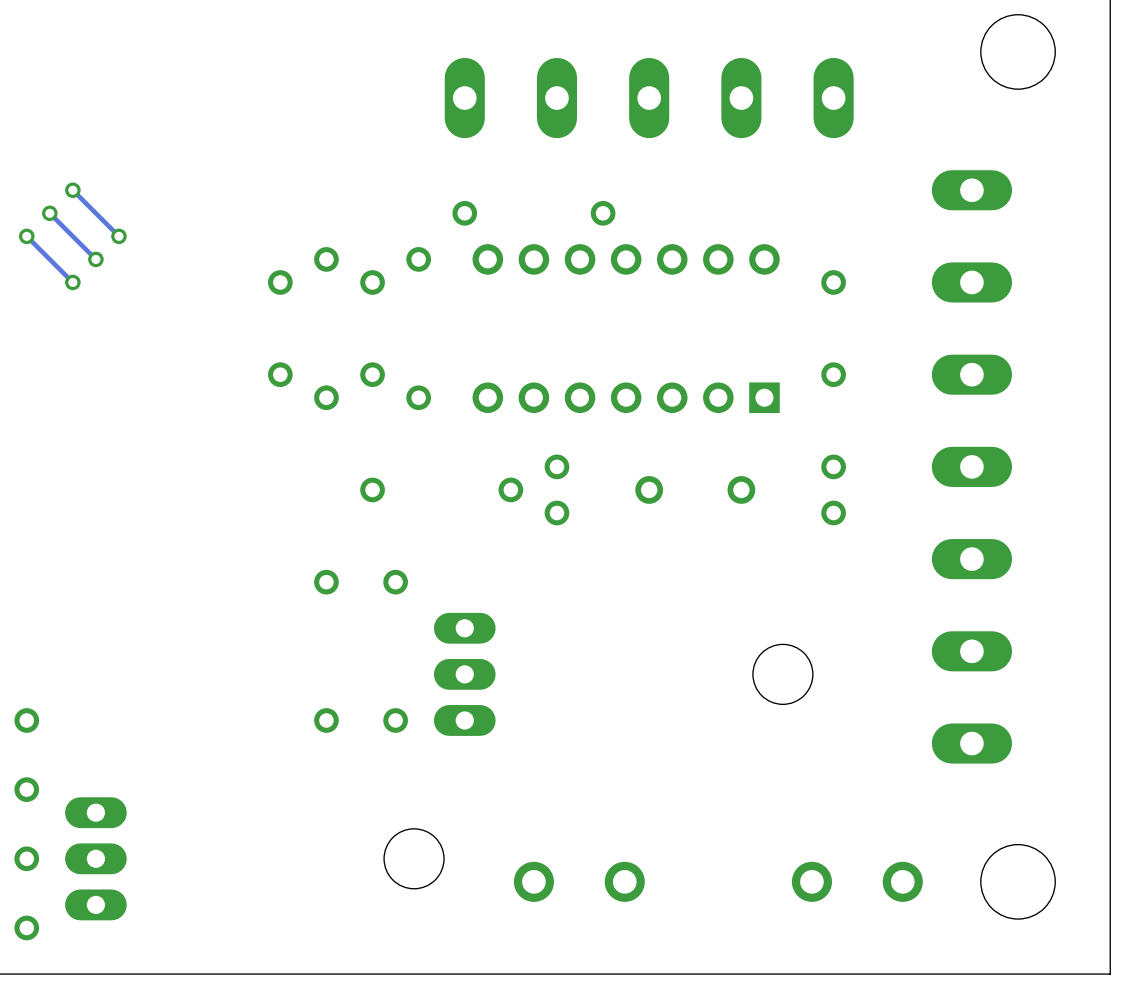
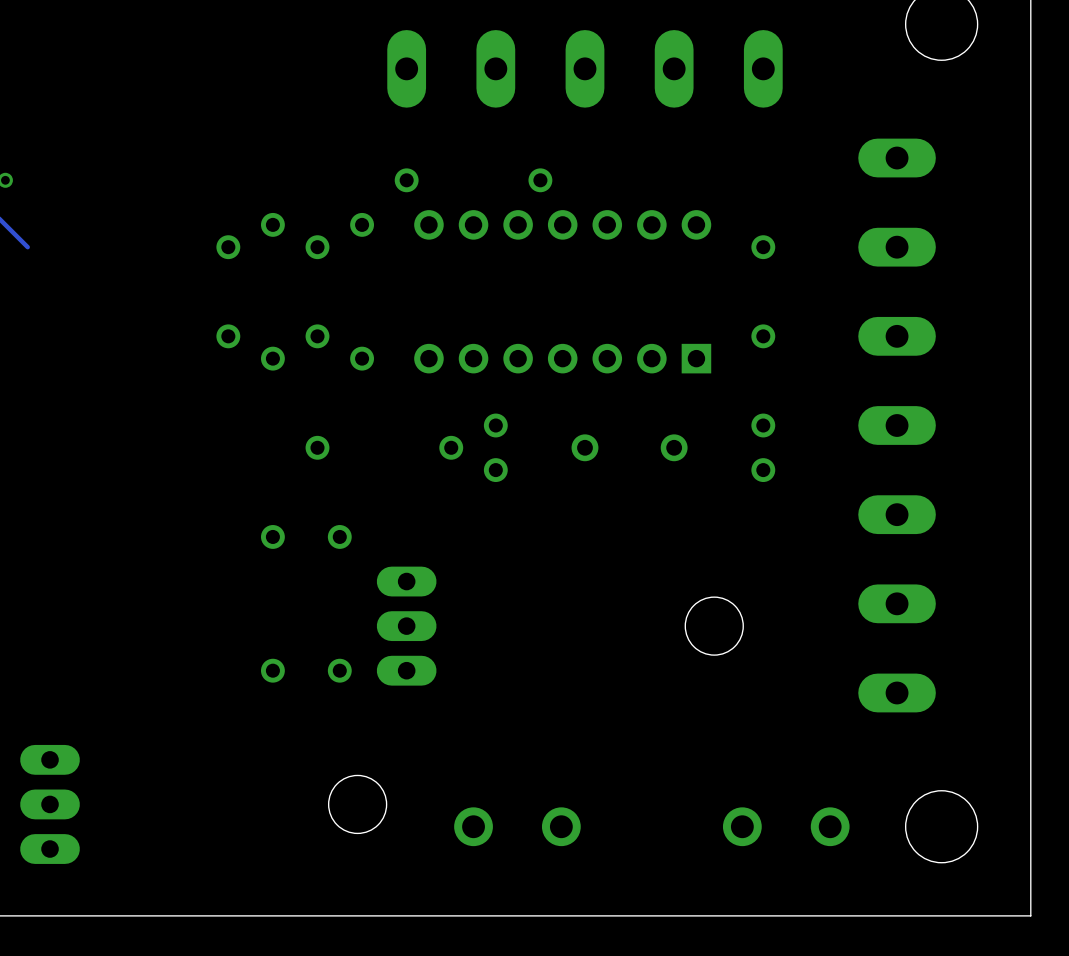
track: (72, 190) (118, 236) -> none
via: (72, 190) -> none
track: (49, 213) (95, 259) -> none
via: (118, 236) -> none
via: (95, 259) -> none
via: (72, 282) -> none

